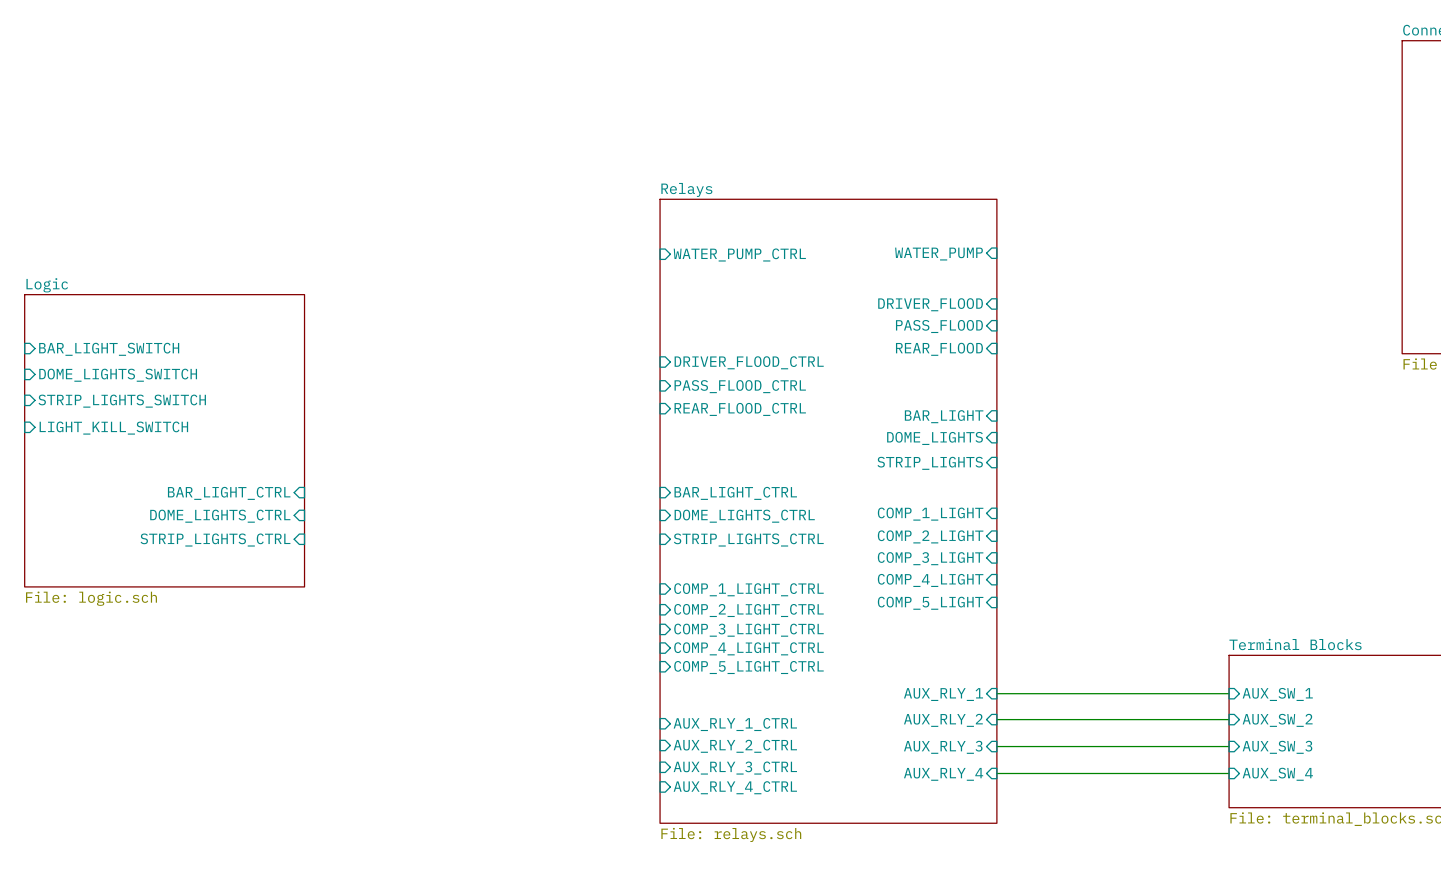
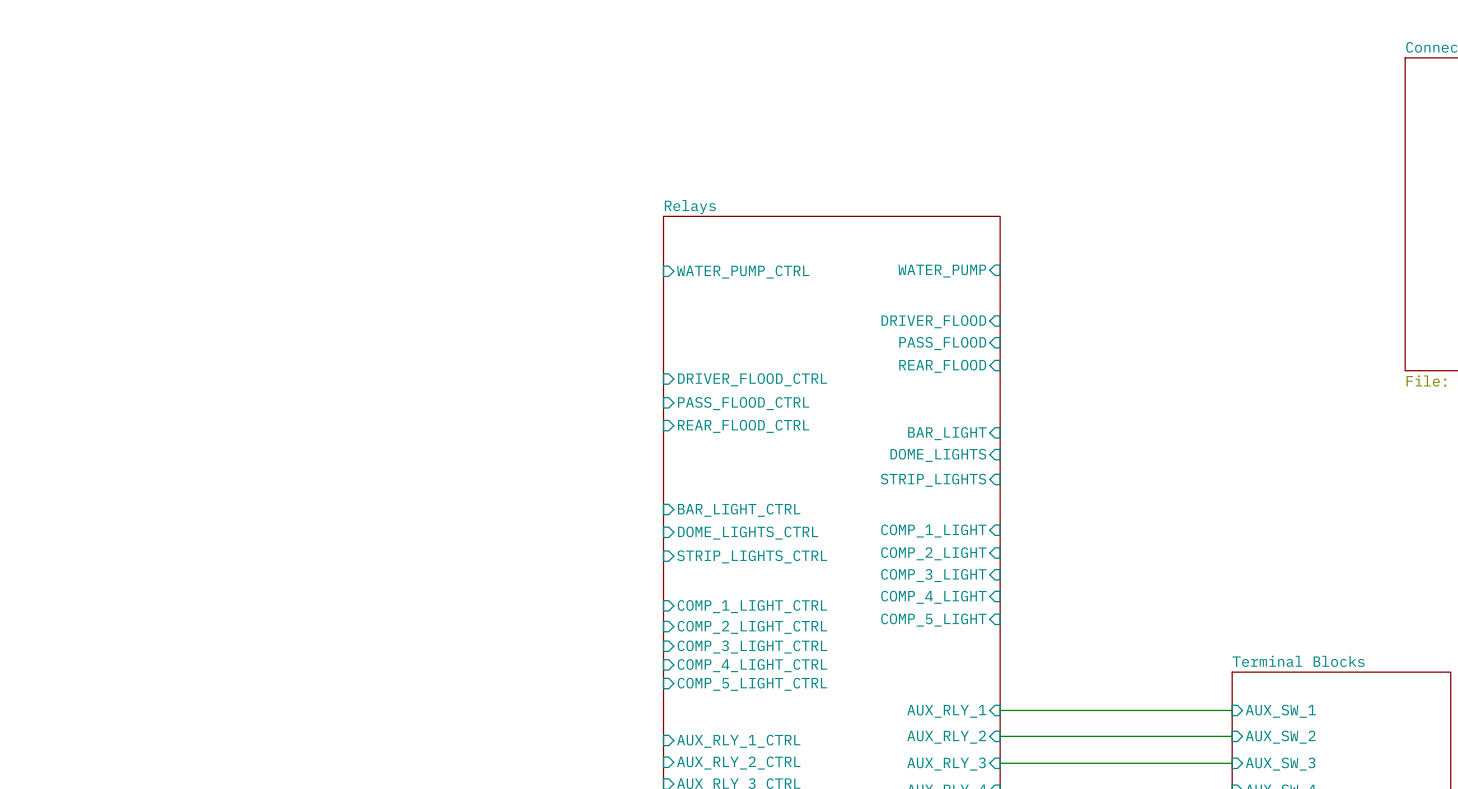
sheet pin: BAR_LIGHT_SWITCH (109, 349) -> none
sheet pin: DOME_LIGHTS_SWITCH (118, 375) -> none
sheet pin: STRIP_LIGHTS_SWITCH (122, 401) -> none
sheet pin: LIGHT_KILL_SWITCH (113, 428) -> none
sheet Logic: File: logic.sch (164, 440) -> none
sheet pin: BAR_LIGHT_CTRL (229, 493) -> none
sheet pin: DOME_LIGHTS_CTRL (220, 516) -> none
sheet pin: STRIP_LIGHTS_CTRL (215, 540) -> none

